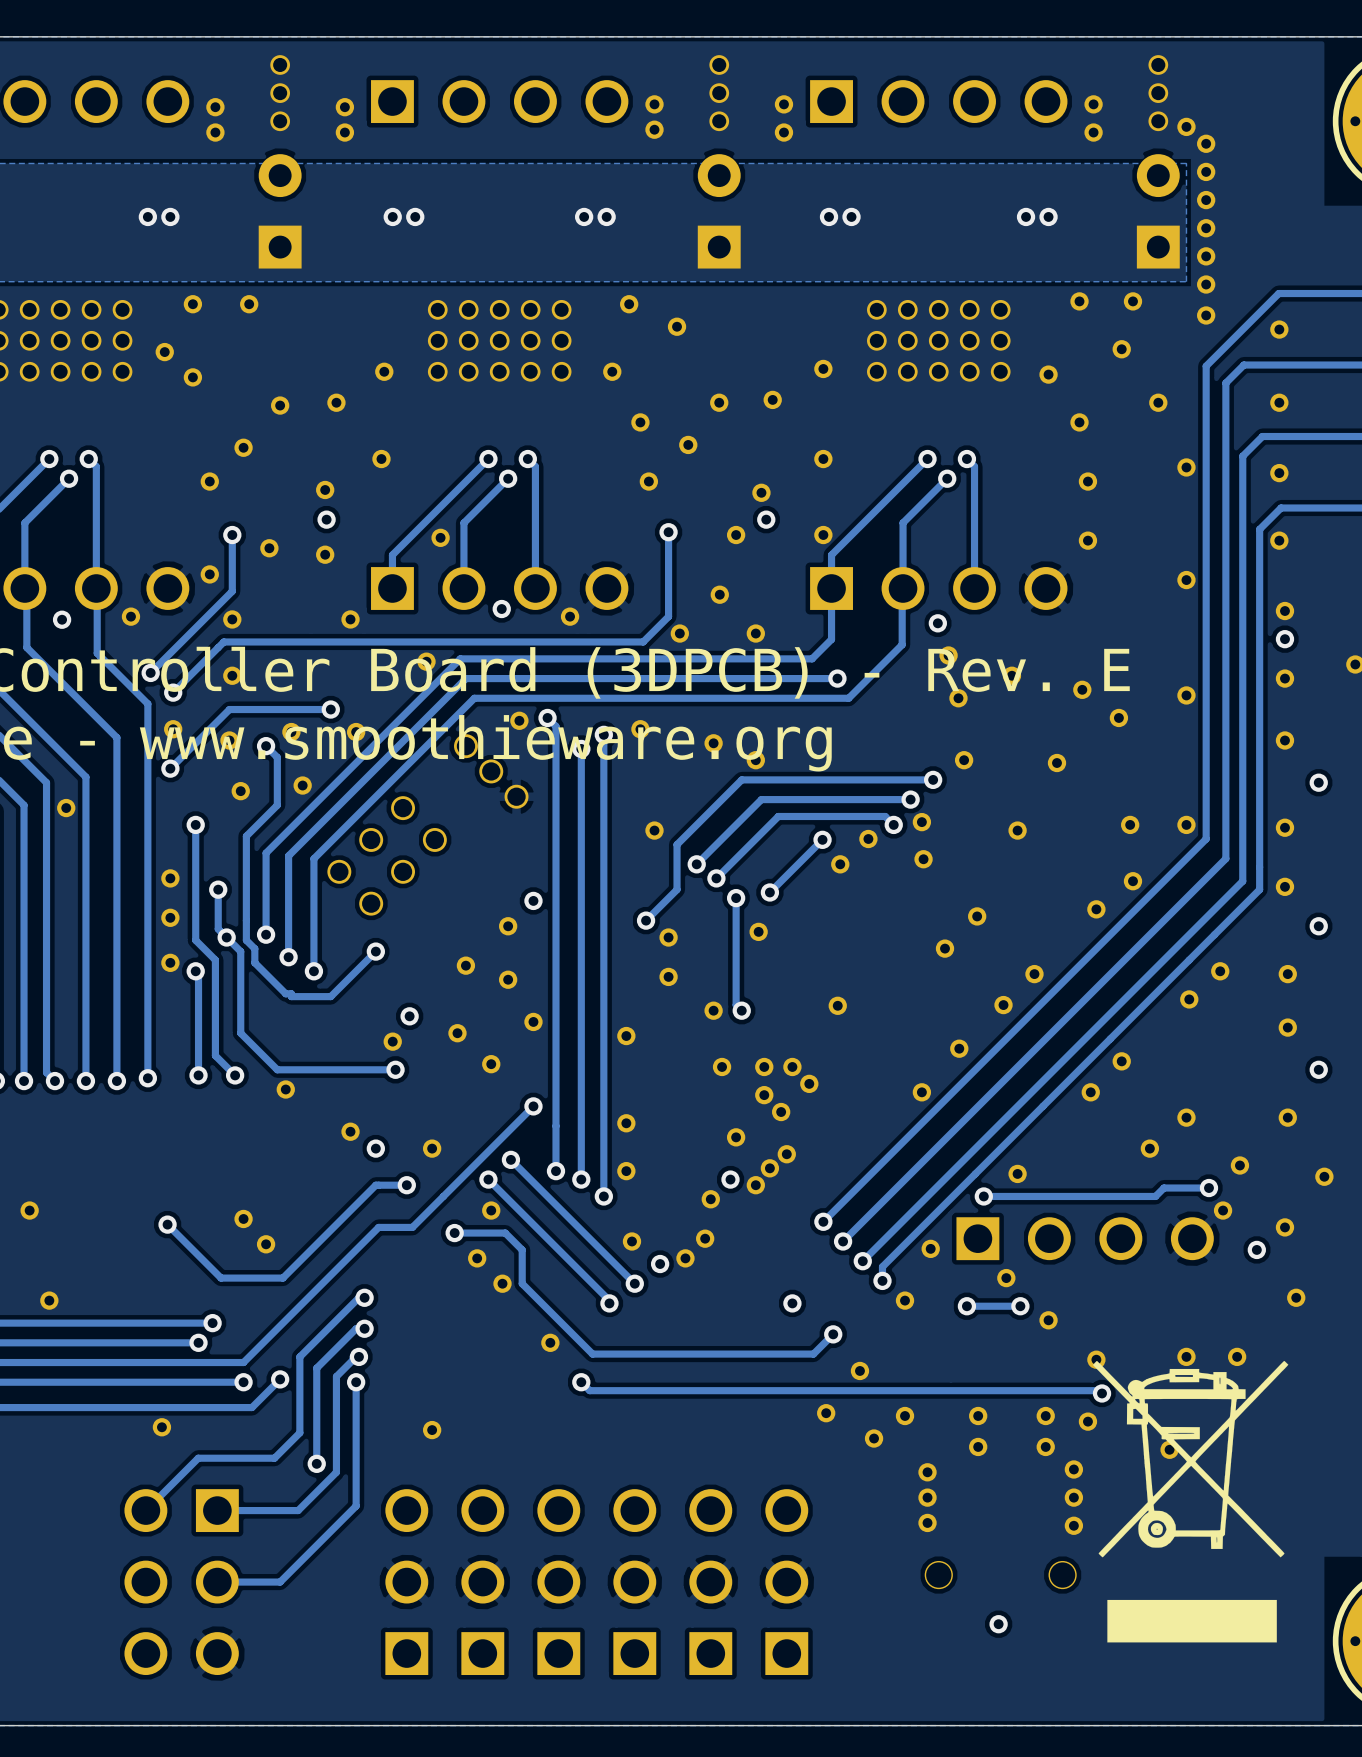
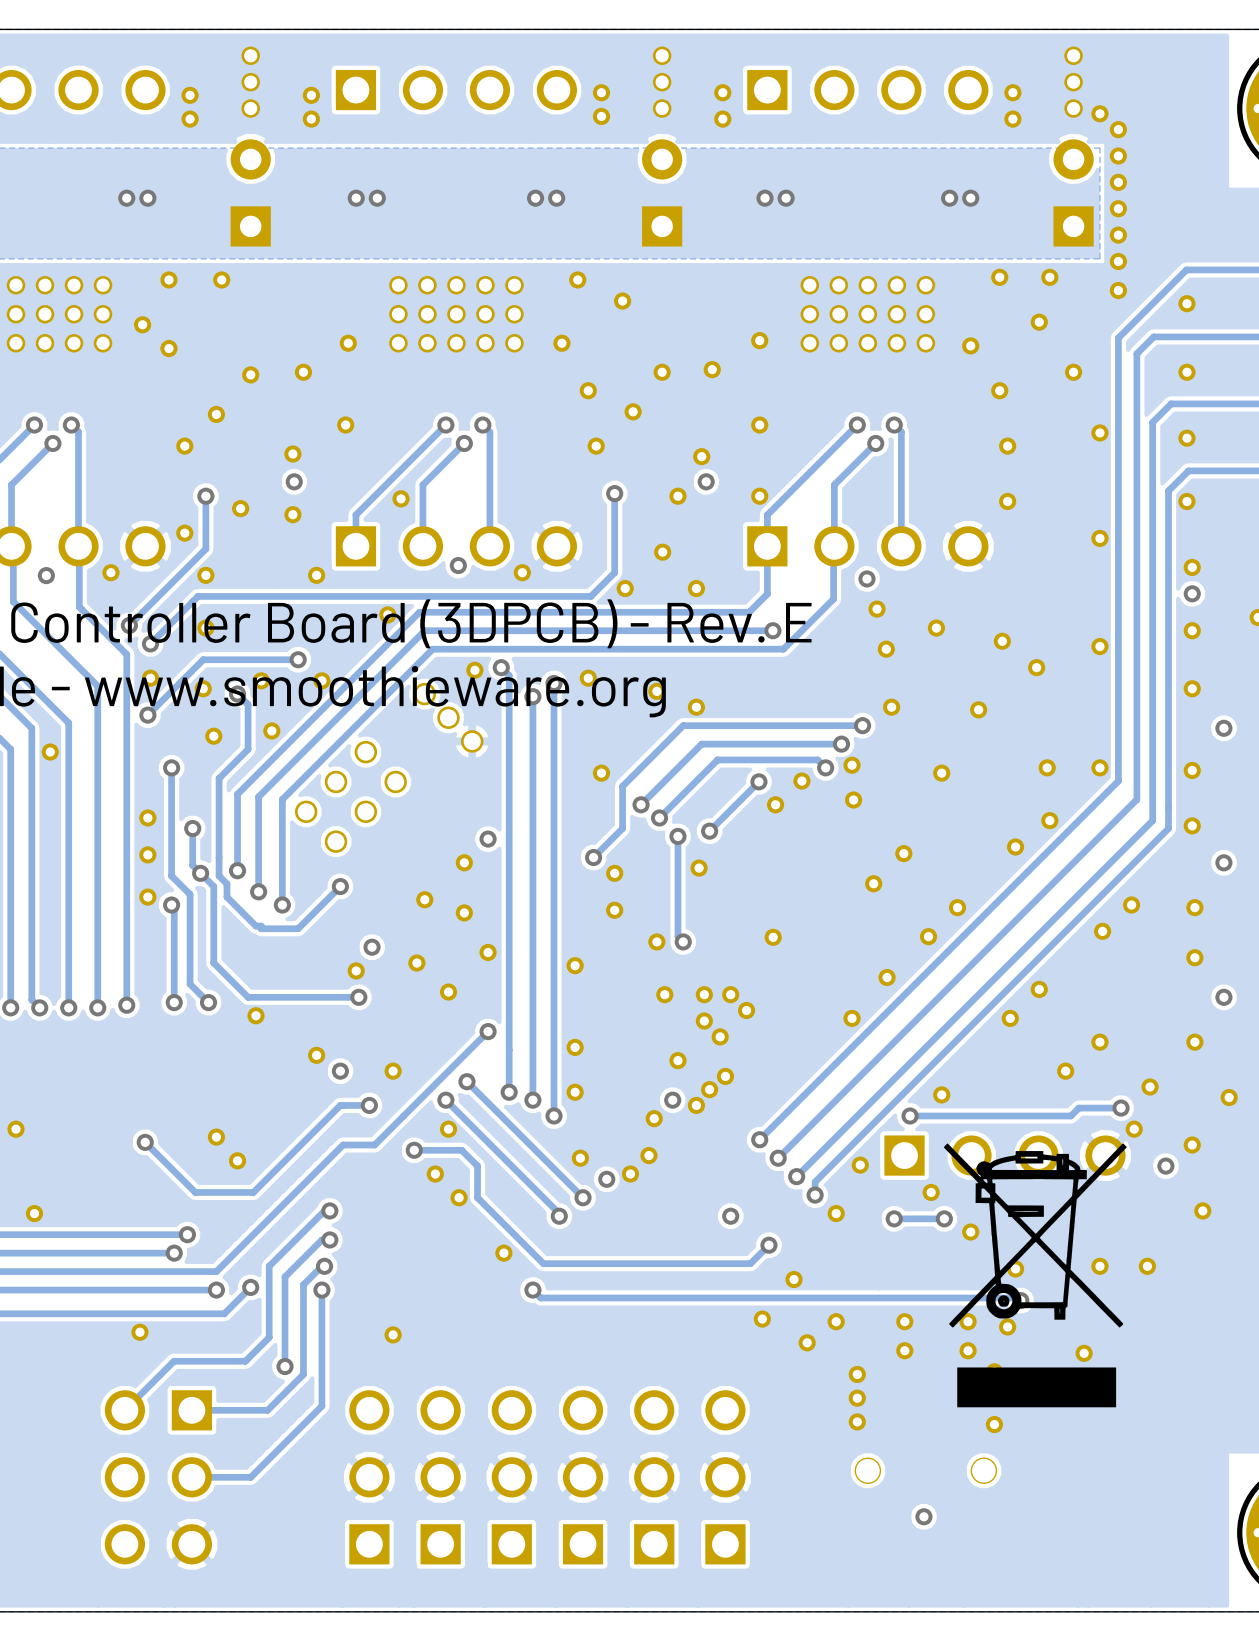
drawing position: (1190, 1501) -> (1035, 1275)

